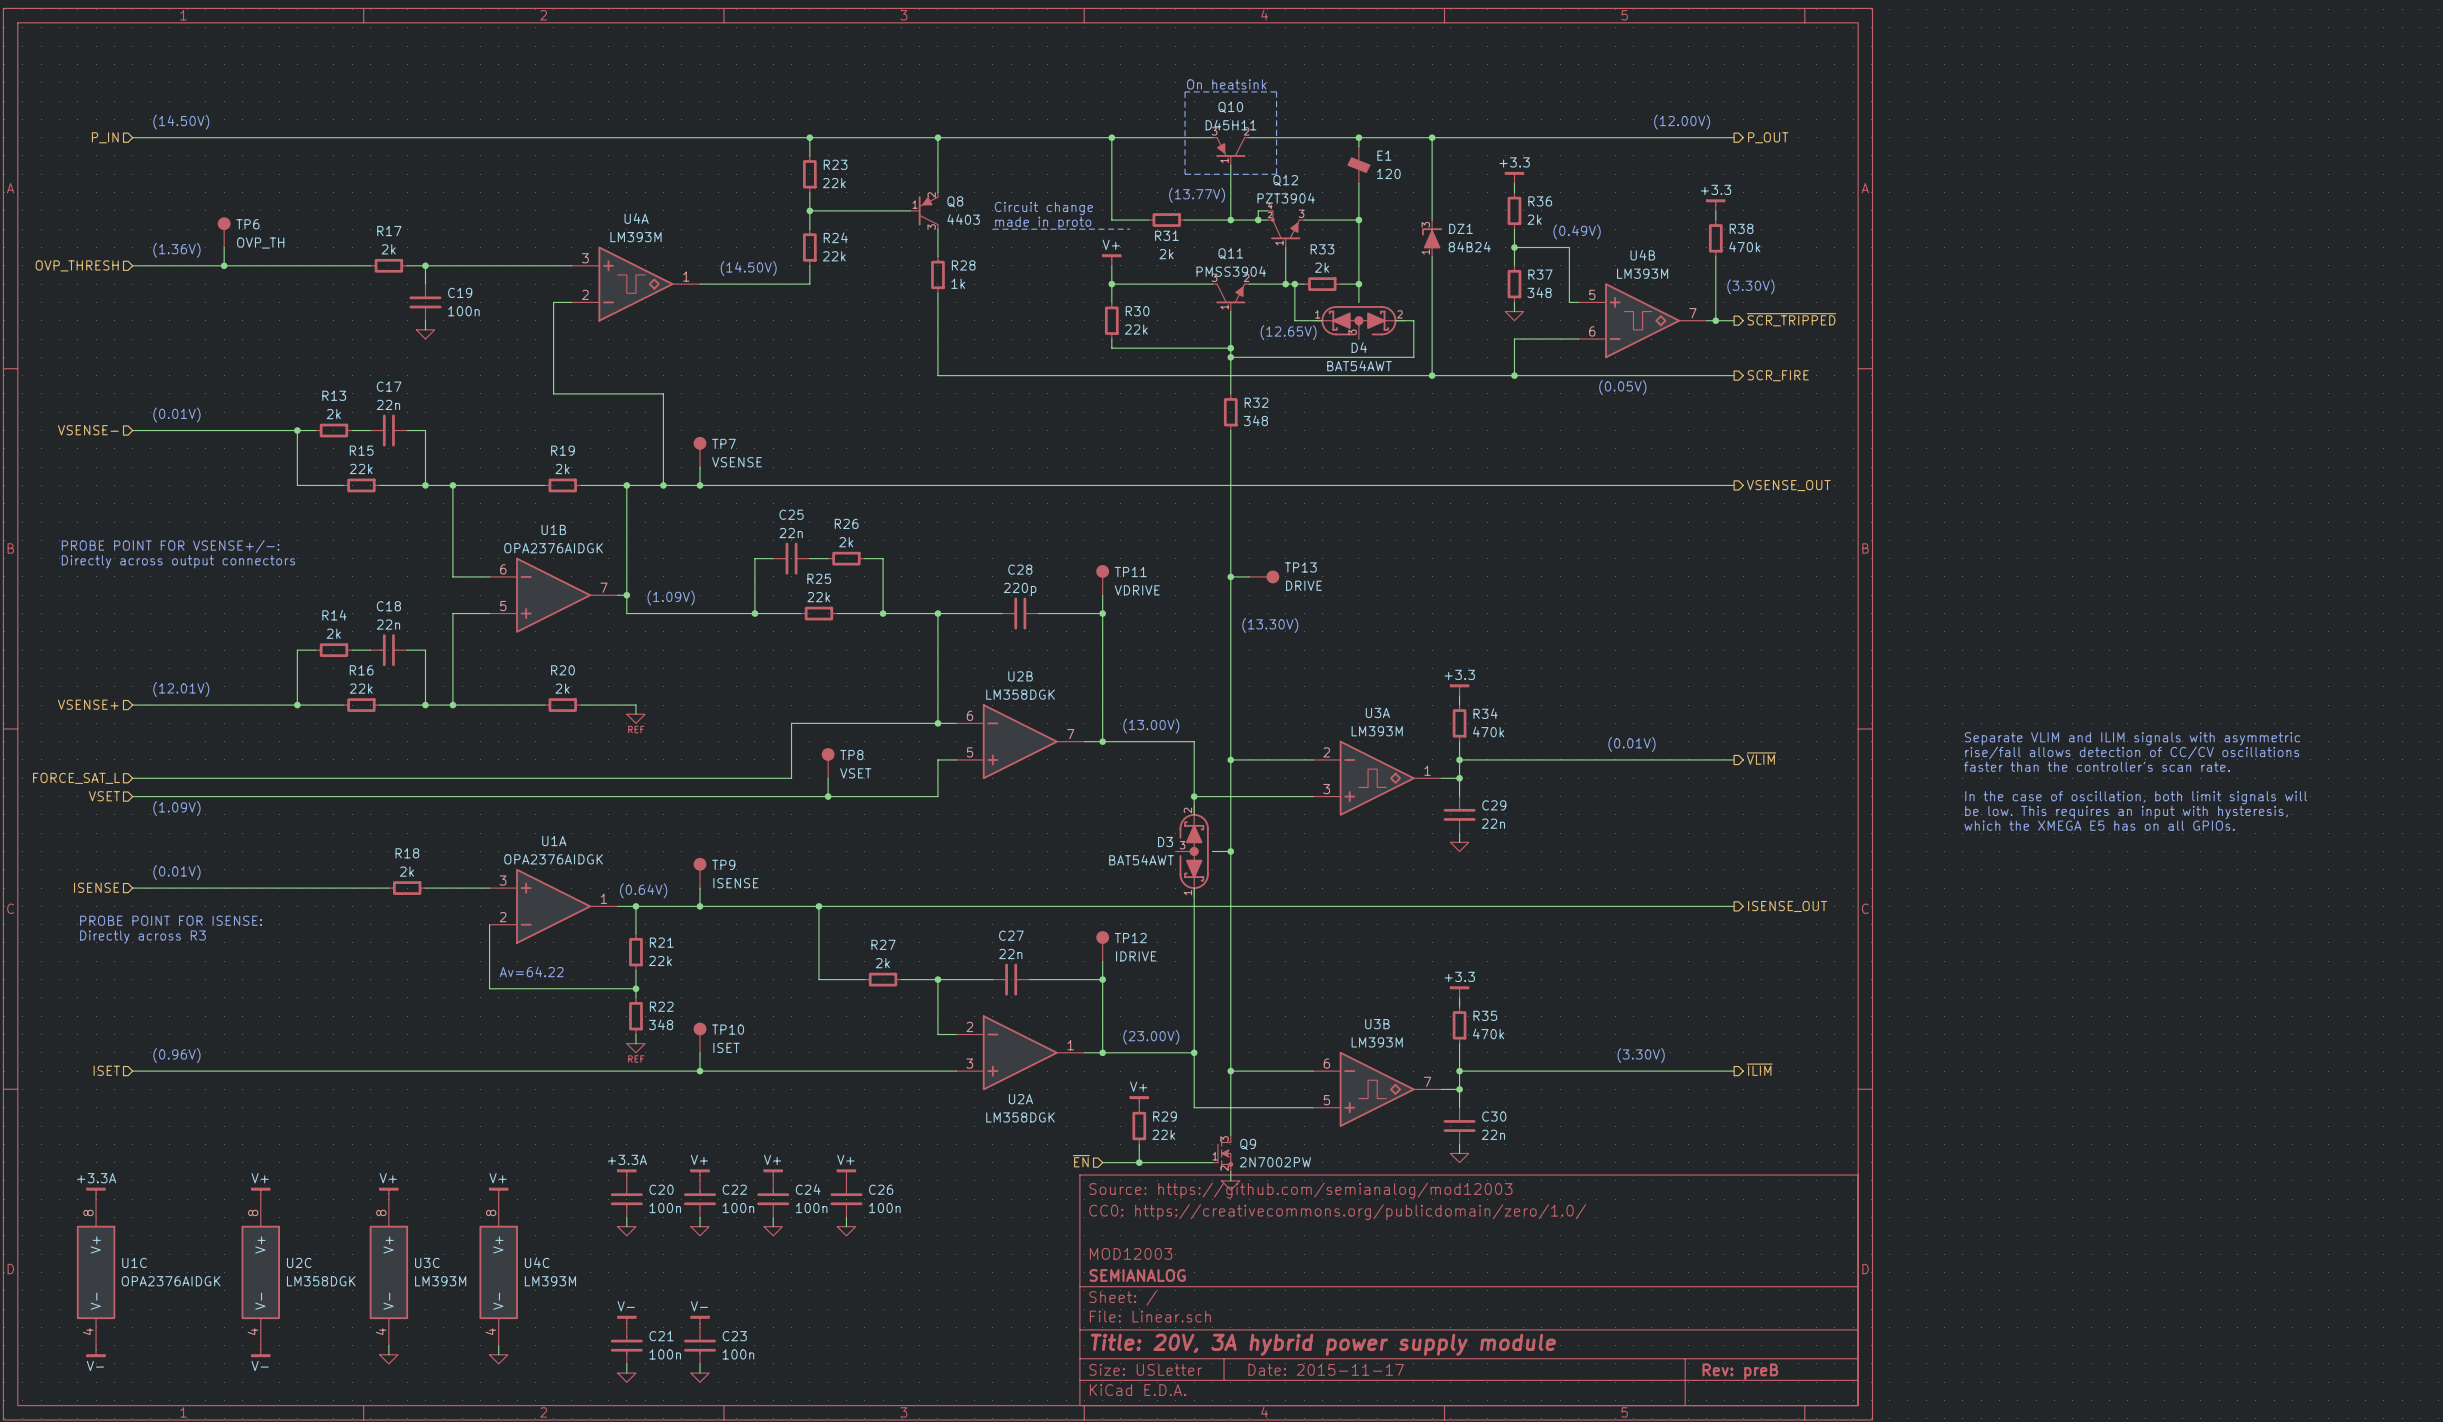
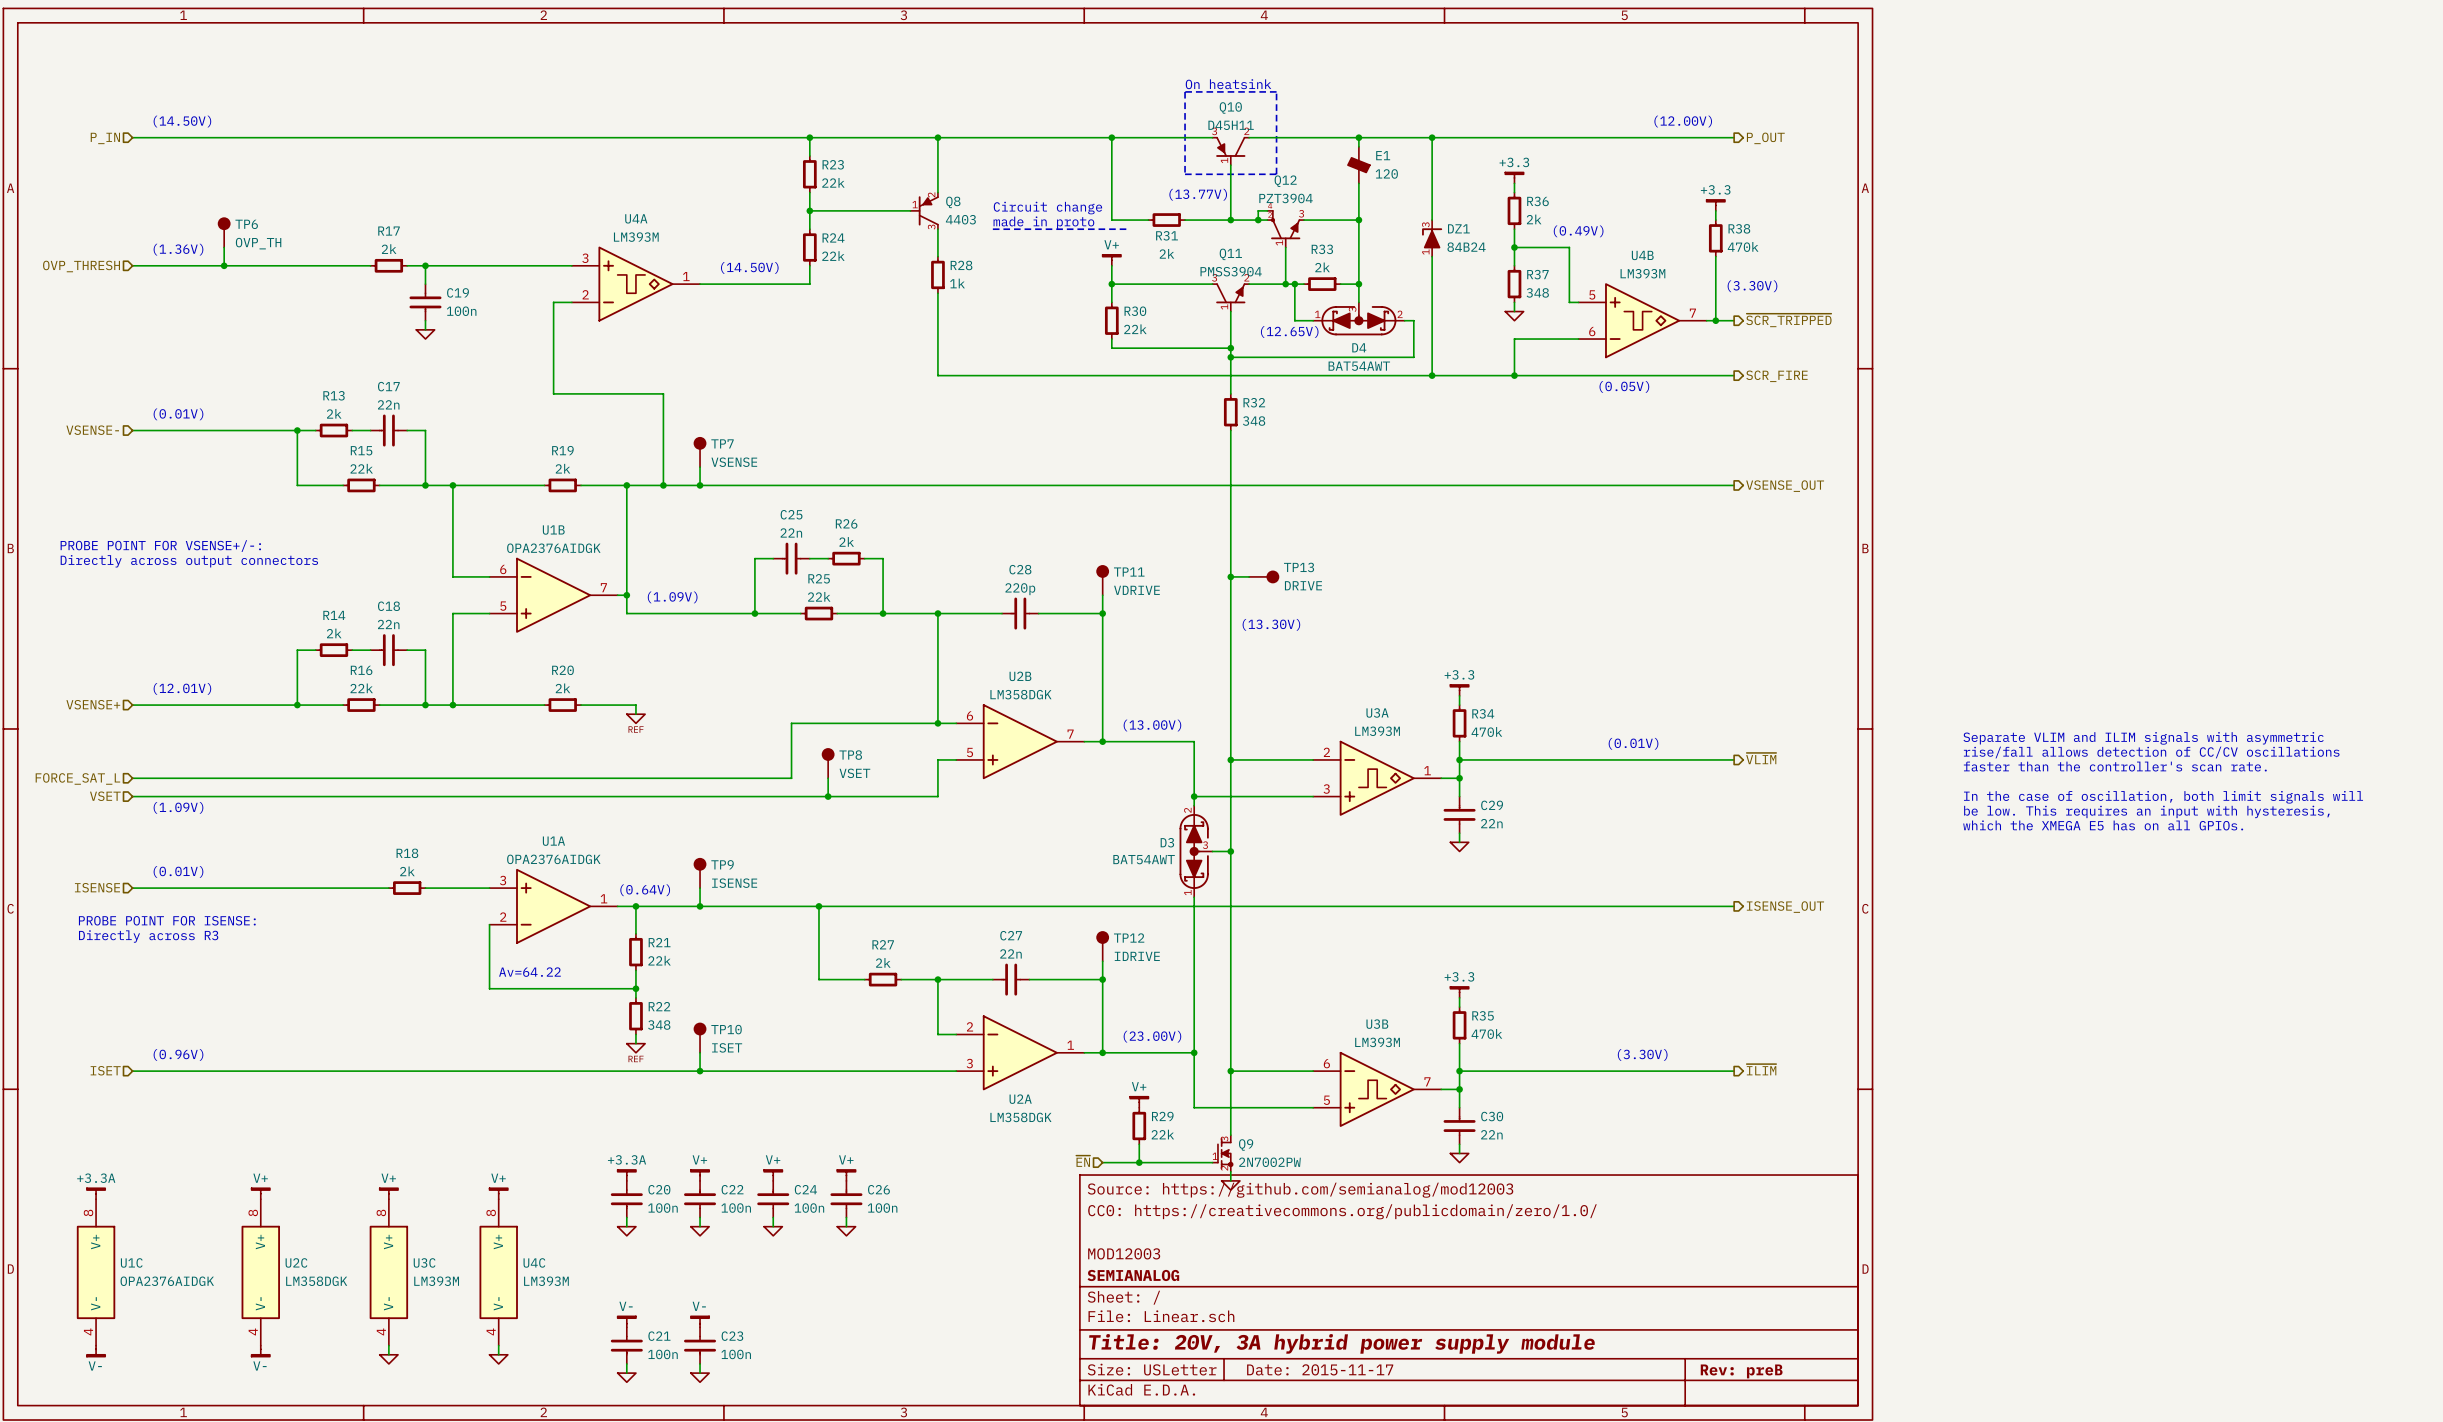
D4 flip: as is (1358, 320) -> up-down (1358, 320)
D3 flip: as is (1194, 851) -> left-right (1194, 851)

